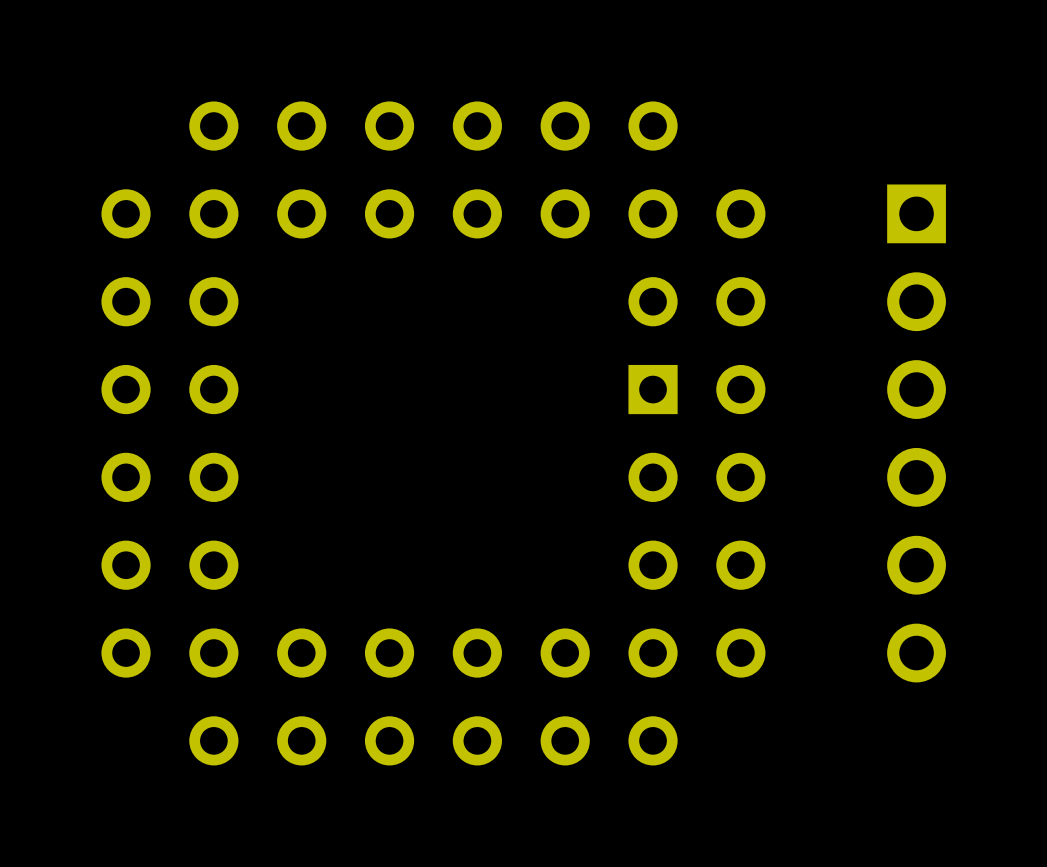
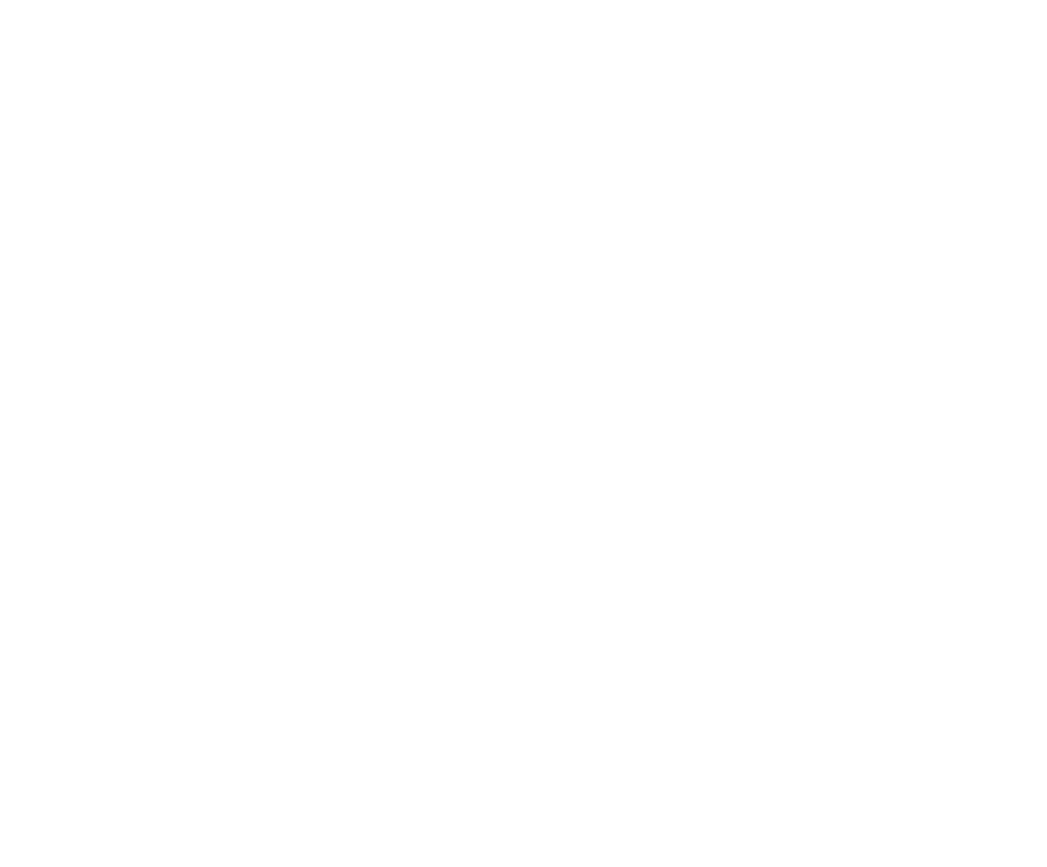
part: (433, 433) -> none
part: (916, 433) -> none

